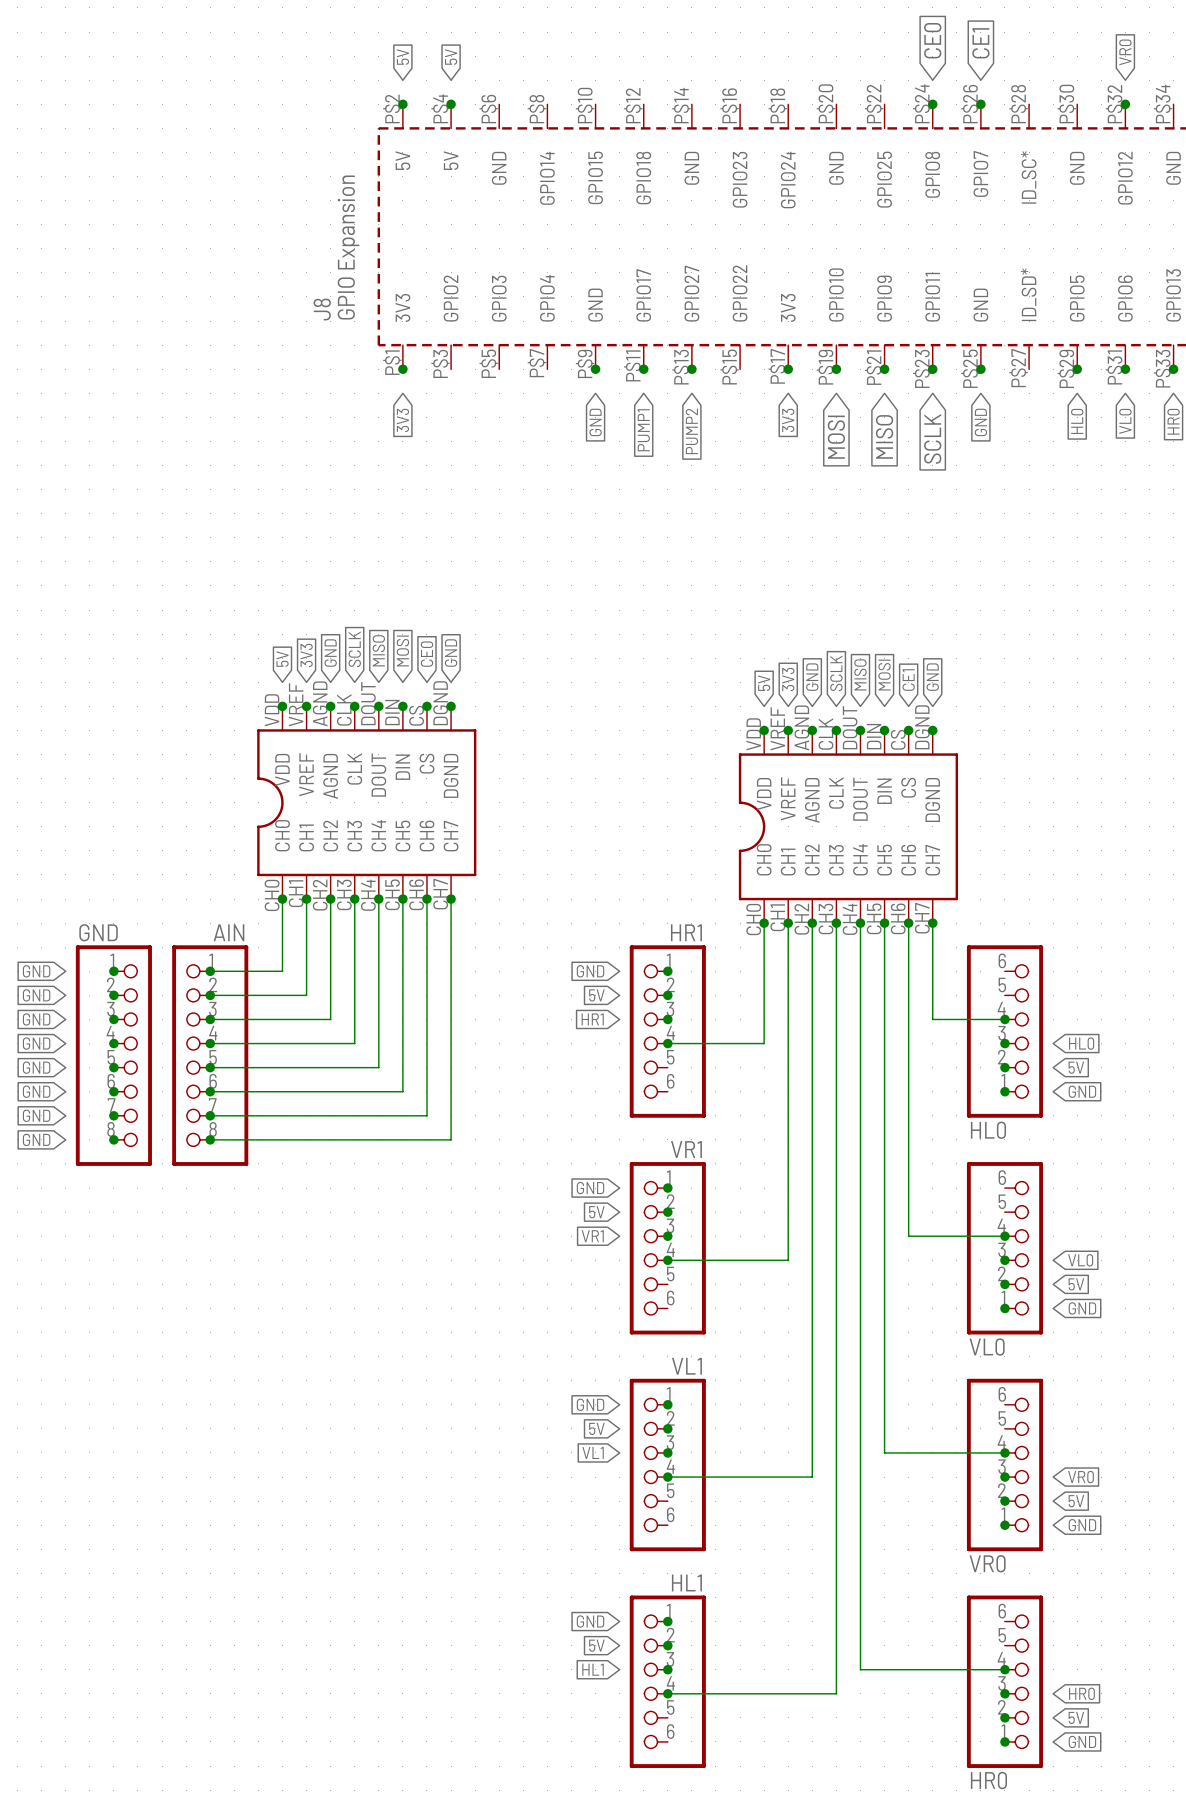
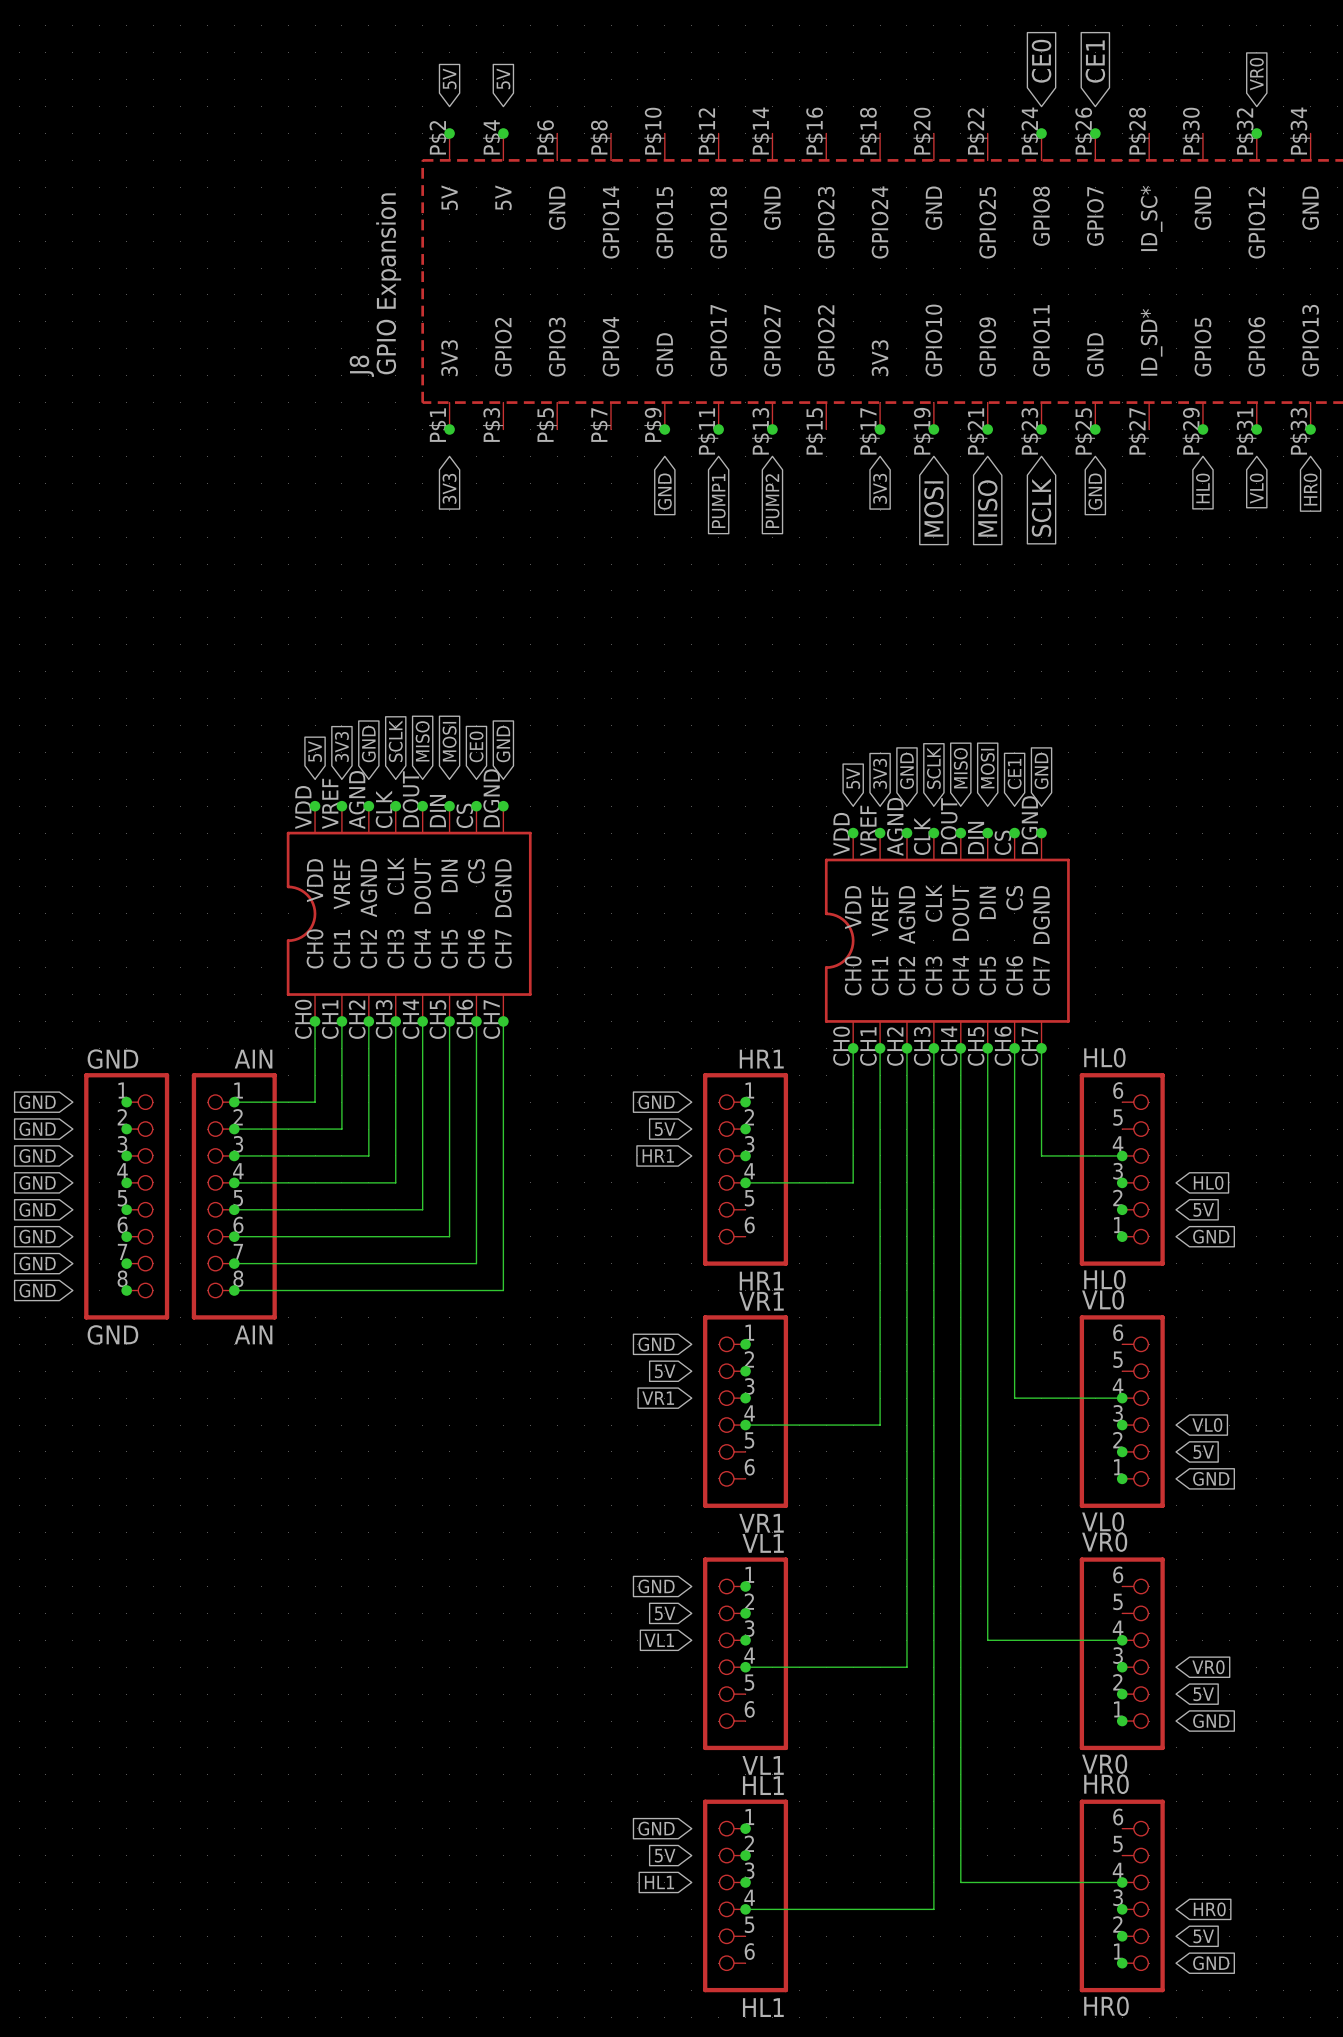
HL0 value: none -> HL0 (1104, 1057)
HR1 value: none -> HR1 (761, 1281)
VL0 value: none -> VL0 (1103, 1299)
GND value: none -> GND (112, 1334)
AIN value: none -> AIN (253, 1334)
VR1 value: none -> VR1 (761, 1523)
VR0 value: none -> VR0 (1104, 1542)
VL1 value: none -> VL1 (763, 1765)
HR0 value: none -> HR0 (1106, 1784)
HL1 value: none -> HL1 (763, 2007)

